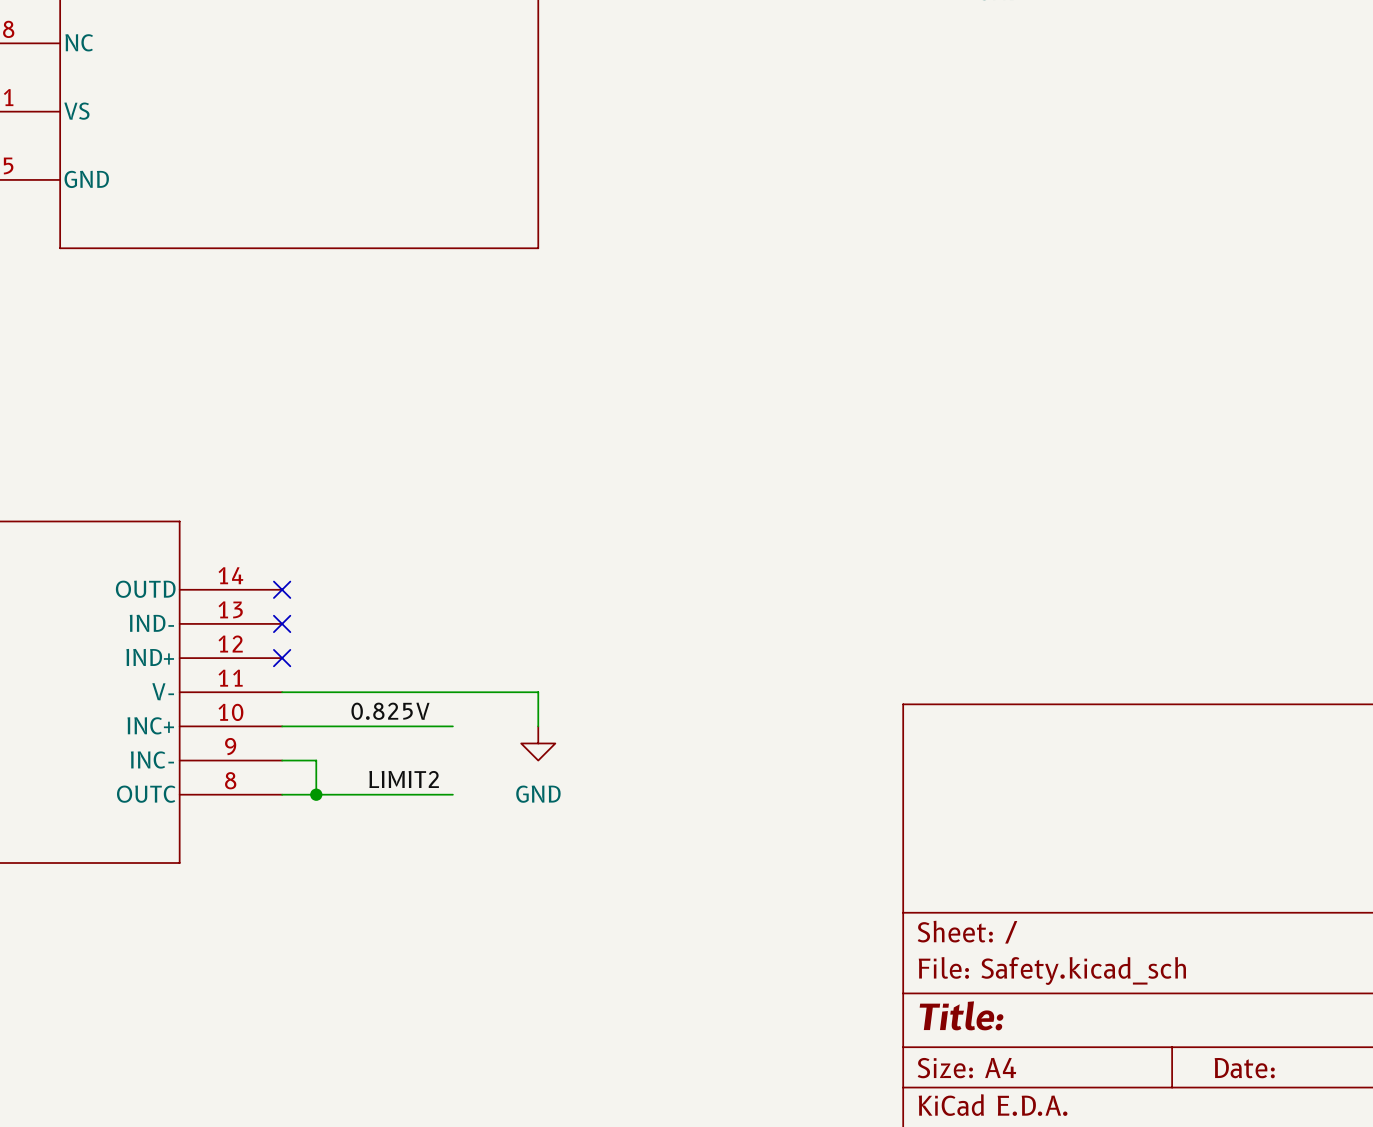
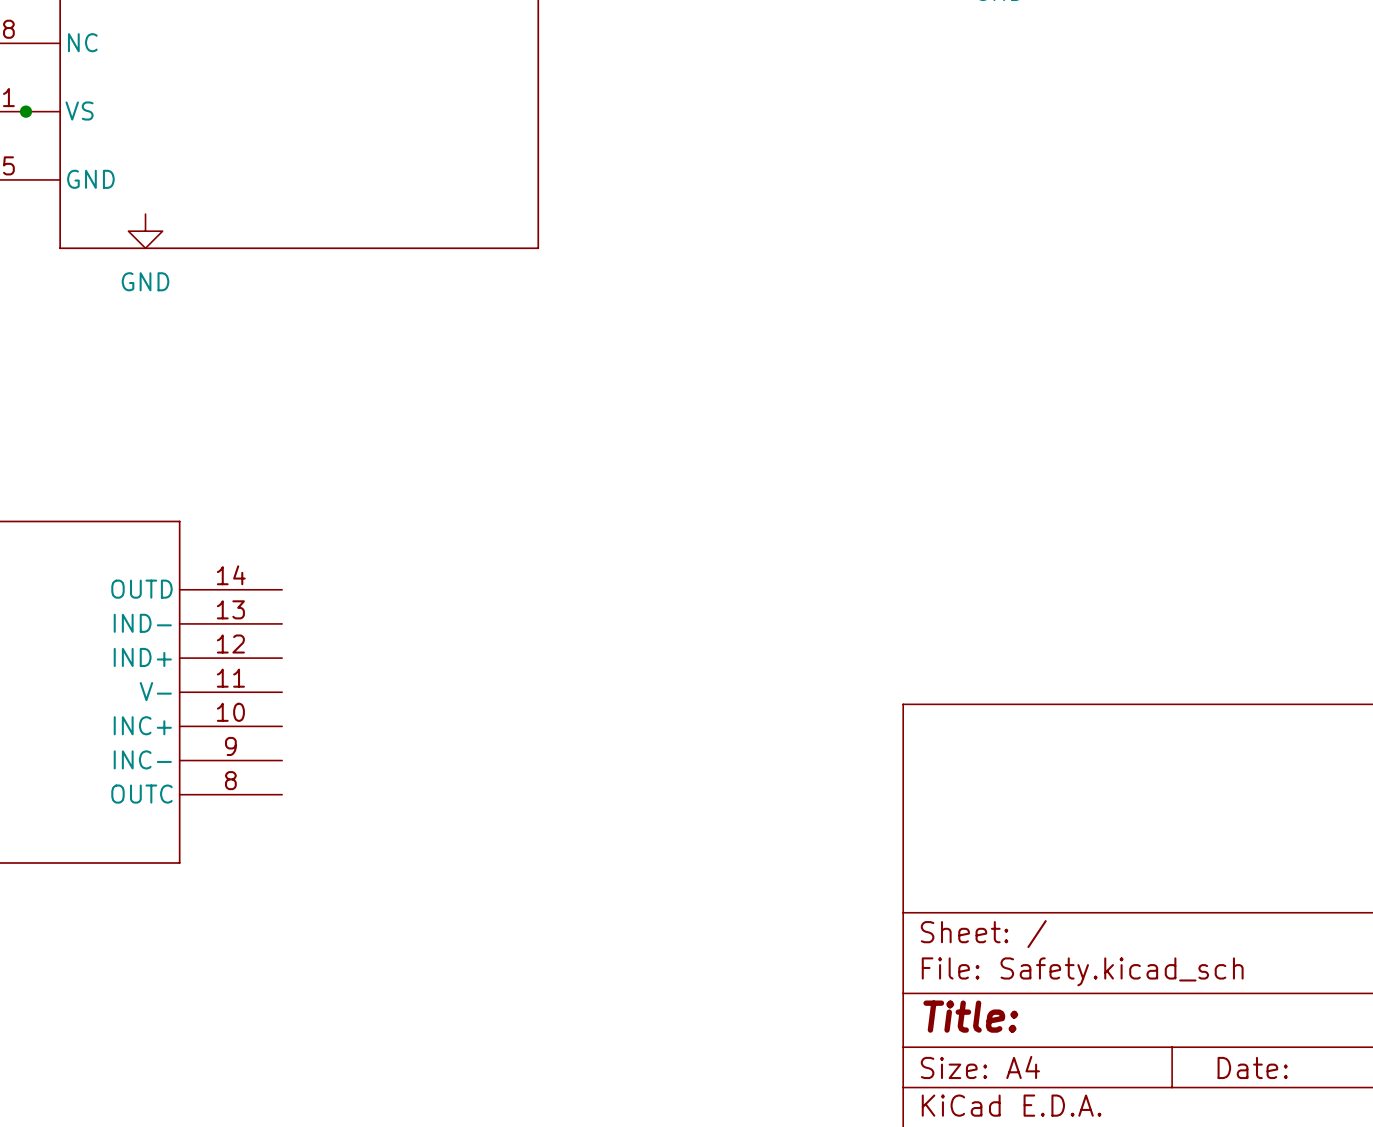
junction: none -> (25, 111)
power symbol: none -> GND (145, 231)
no-connect mark: (282, 589) -> none
no-connect mark: (282, 623) -> none
no-connect mark: (282, 658) -> none
wire: (282, 692) (538, 692) (538, 726) -> none
label: 0.825V (390, 711) -> none
wire: (282, 726) (452, 726) -> none
power symbol: GND (538, 743) -> none
wire: (282, 760) (316, 760) (316, 794) -> none
label: LIMIT2 (404, 779) -> none
wire: (282, 794) (452, 794) -> none
junction: (316, 794) -> none

